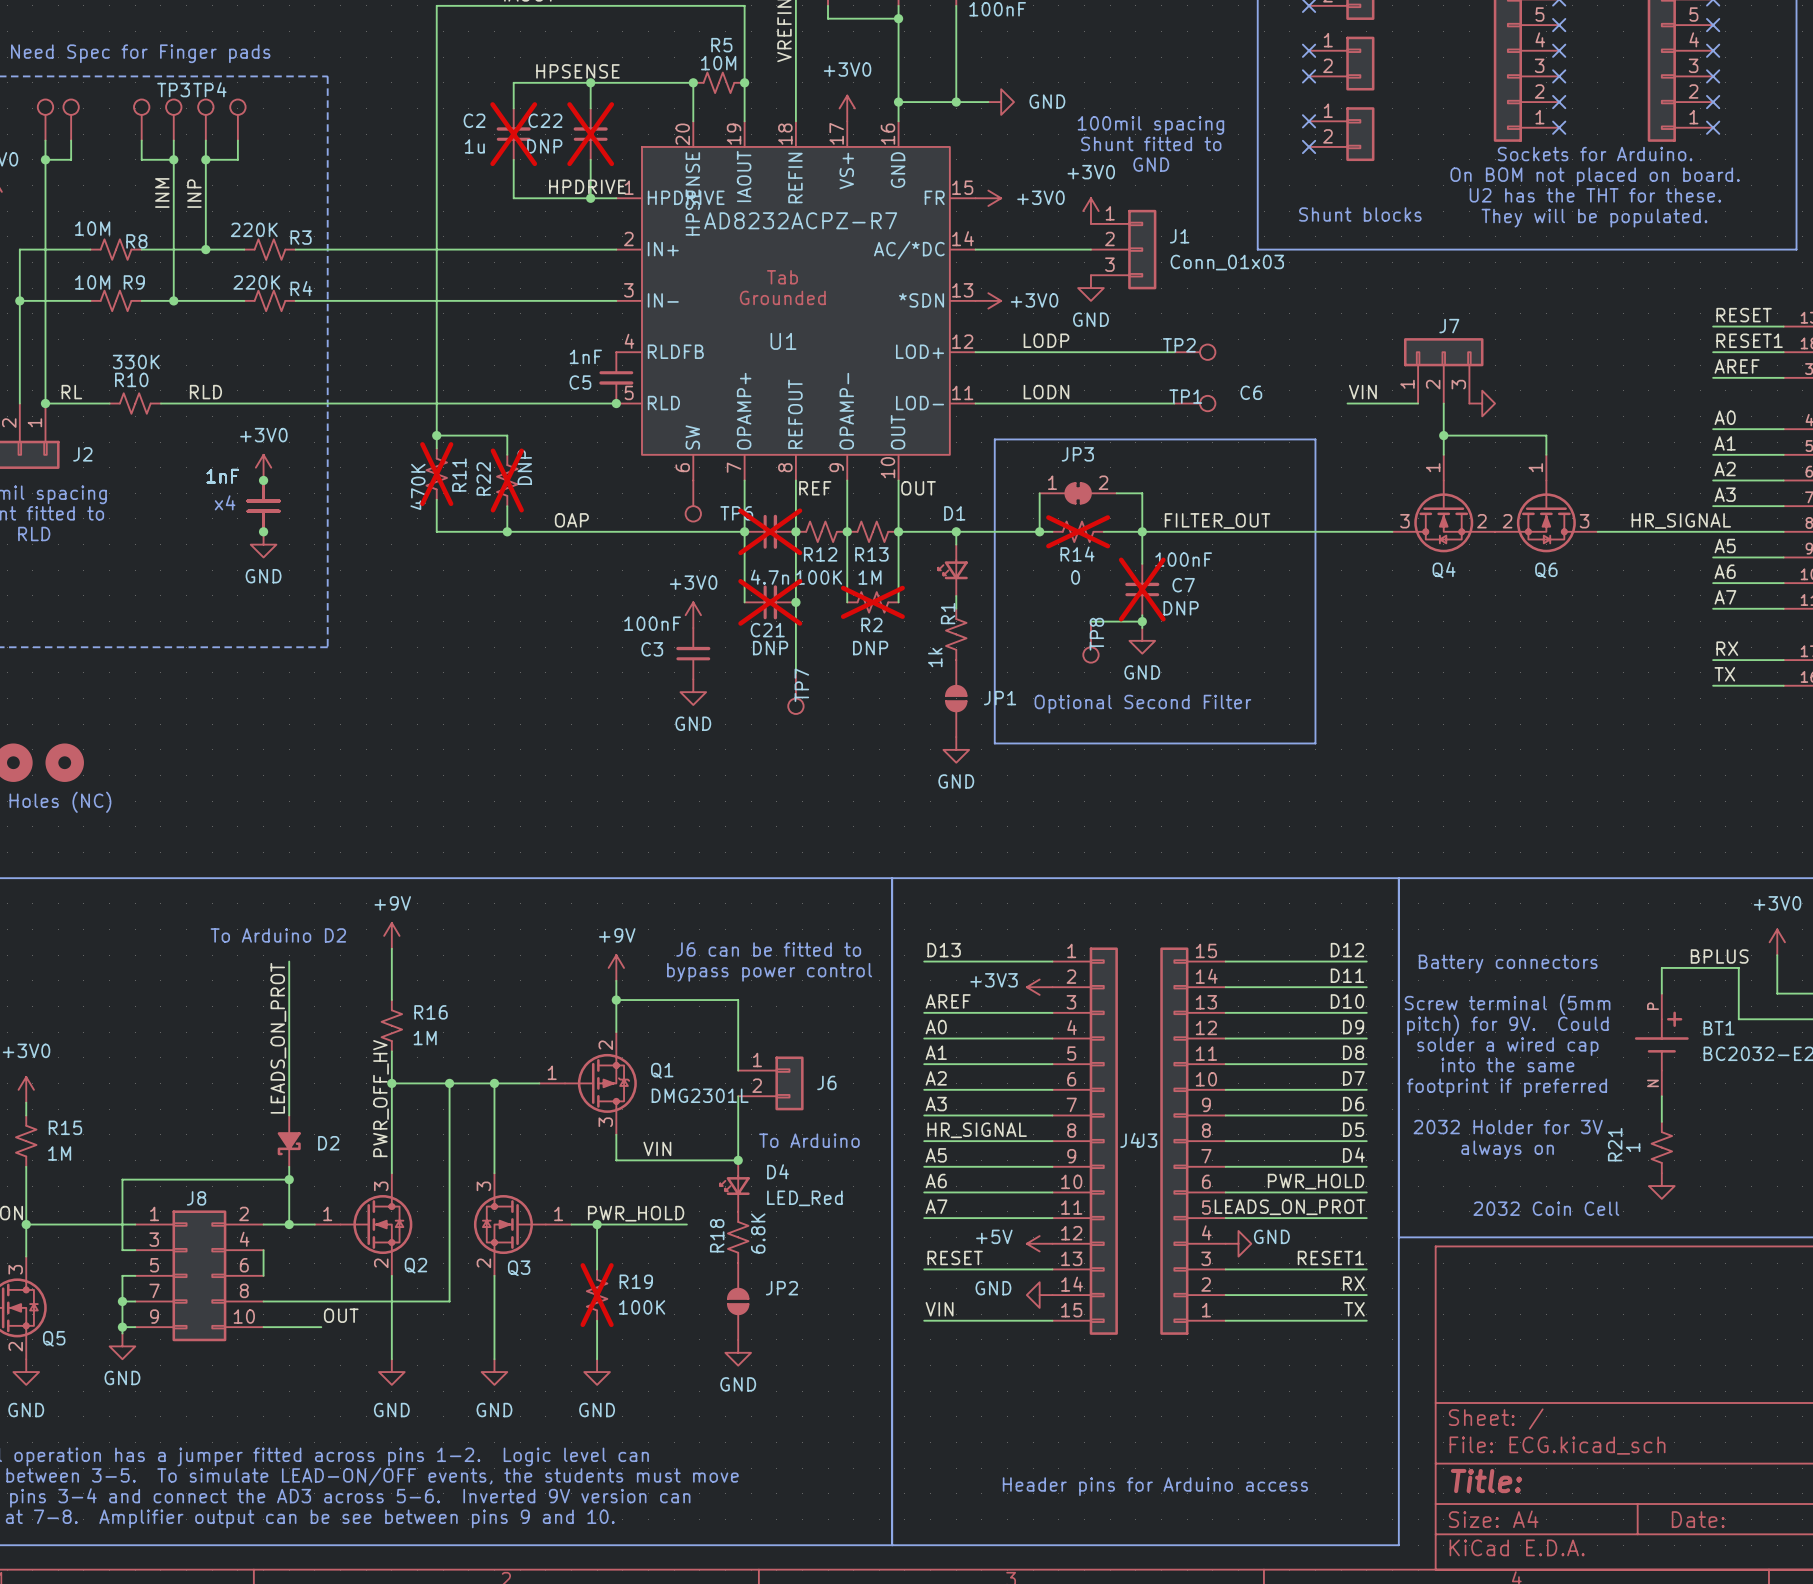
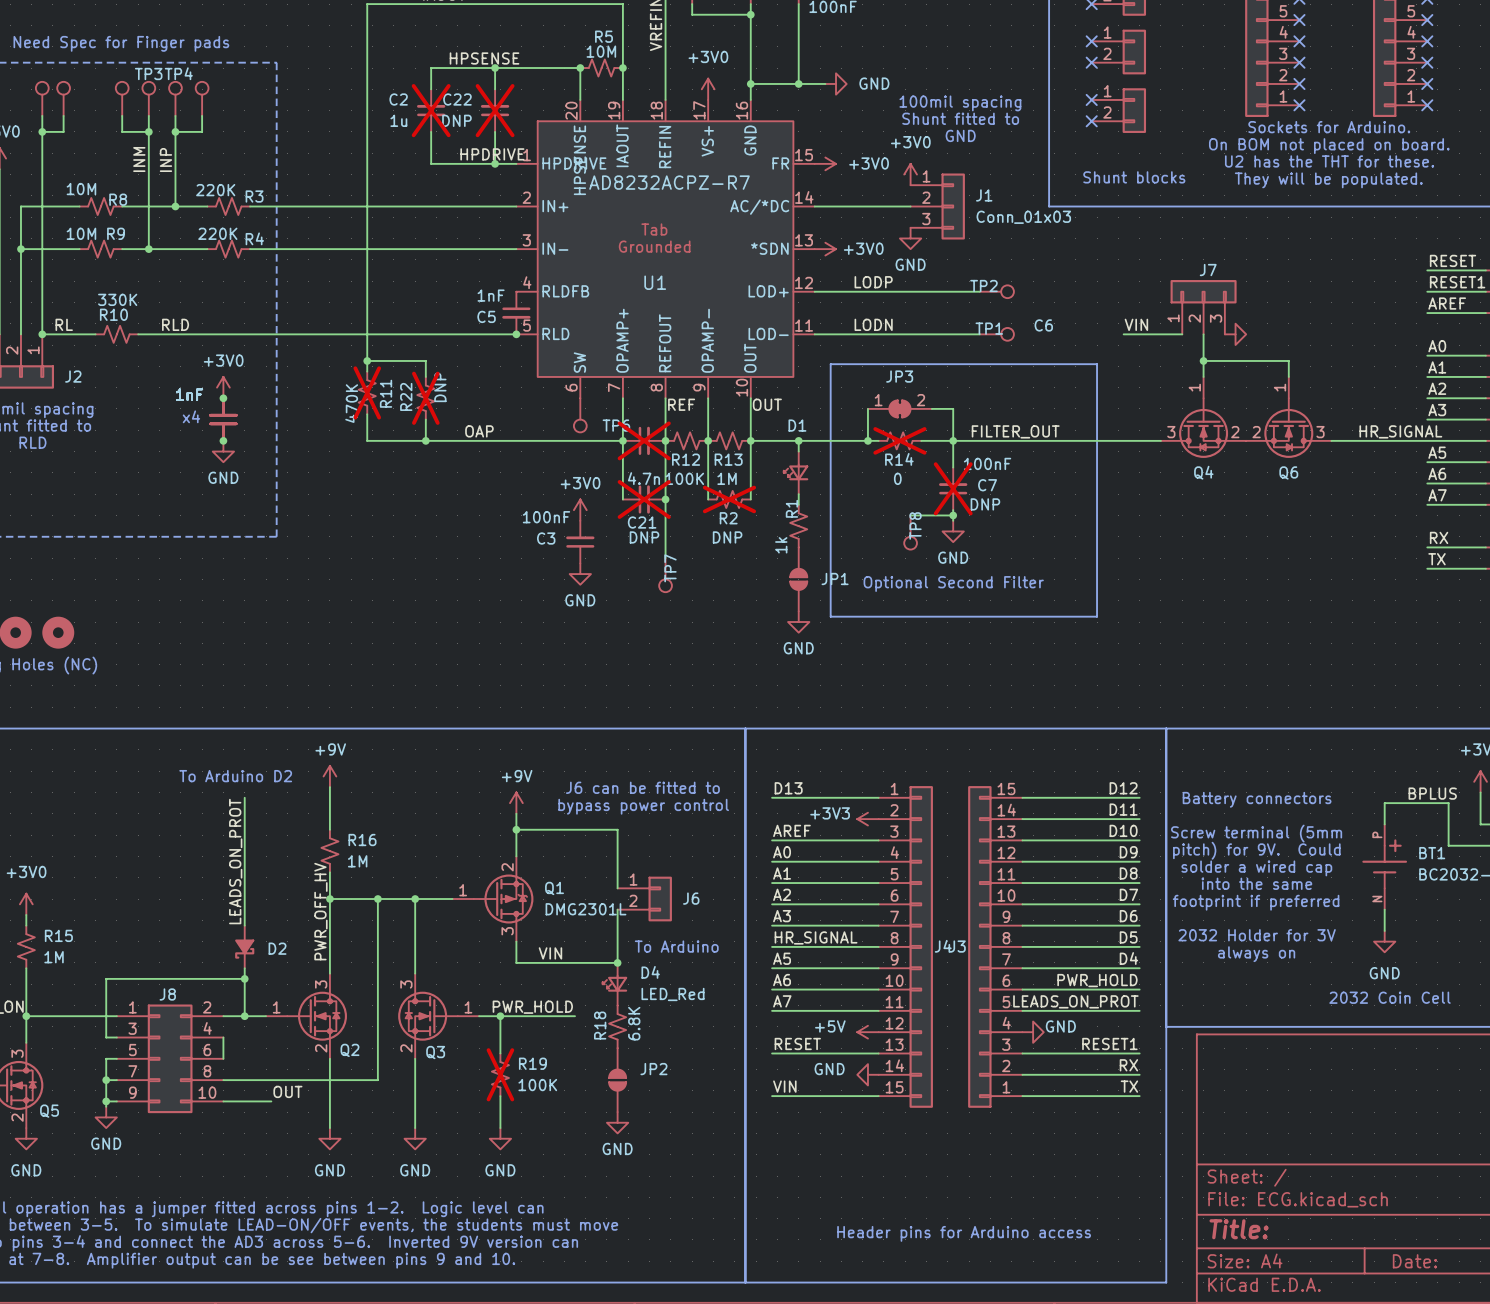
power symbol: none -> GND (1384, 941)
R21: 1 (1661, 1147) -> none
power symbol: (1661, 1186) -> none
text position: 2032 Coin Cell (1546, 1208) -> 2032 Coin Cell (1390, 997)

